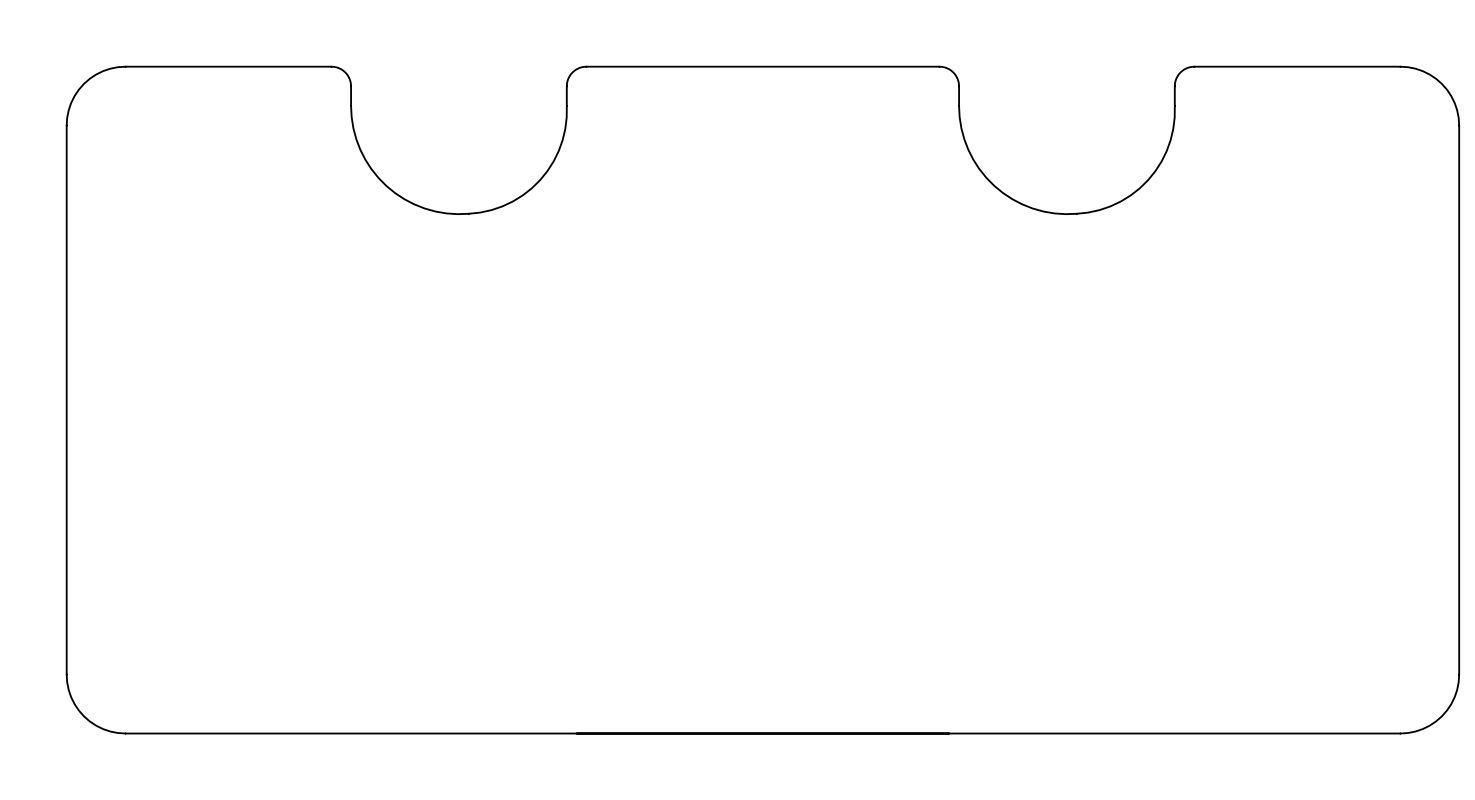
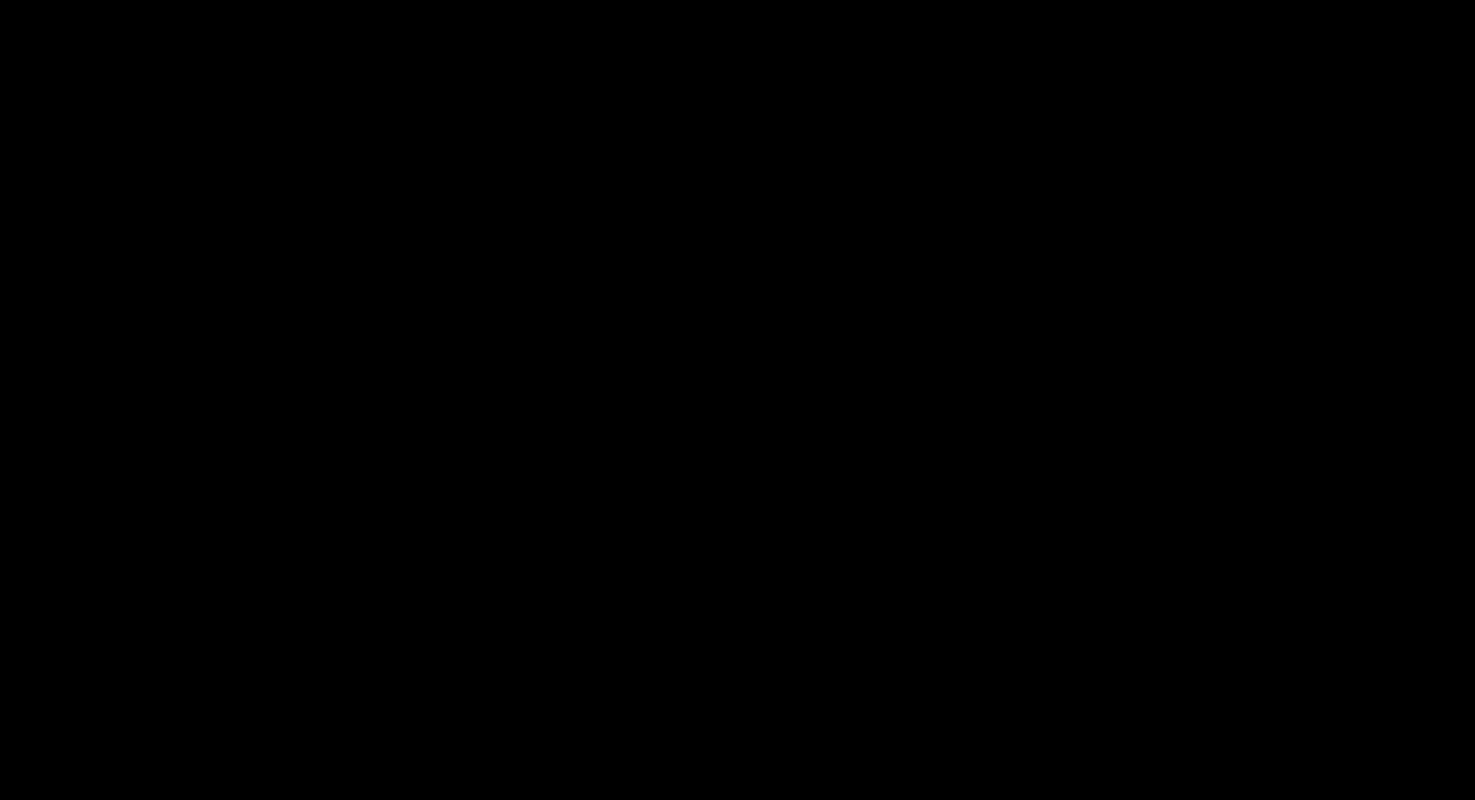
part: (762, 400) -> none

